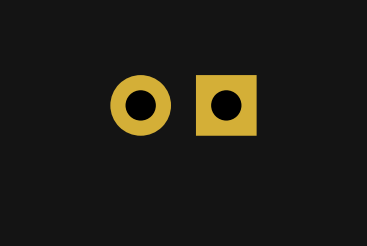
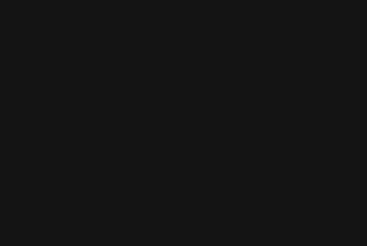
part: (183, 105) -> none

